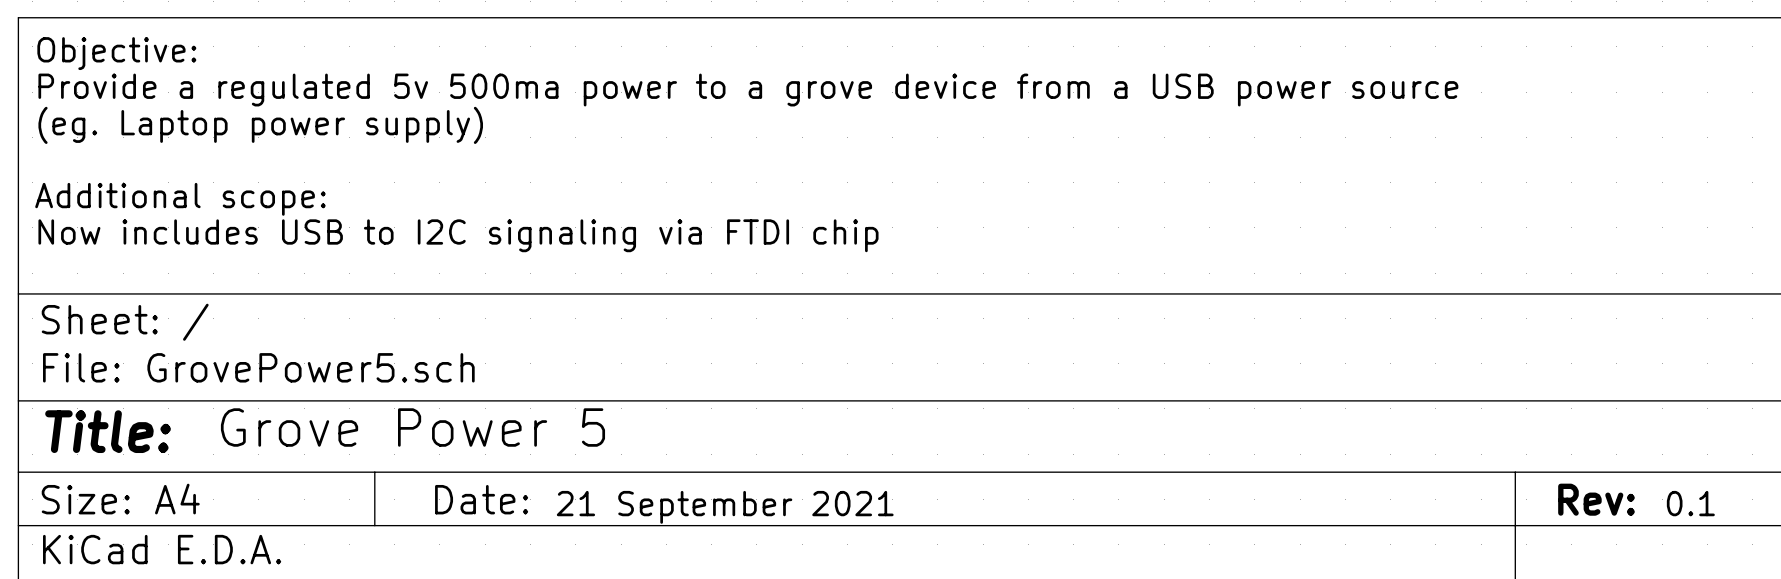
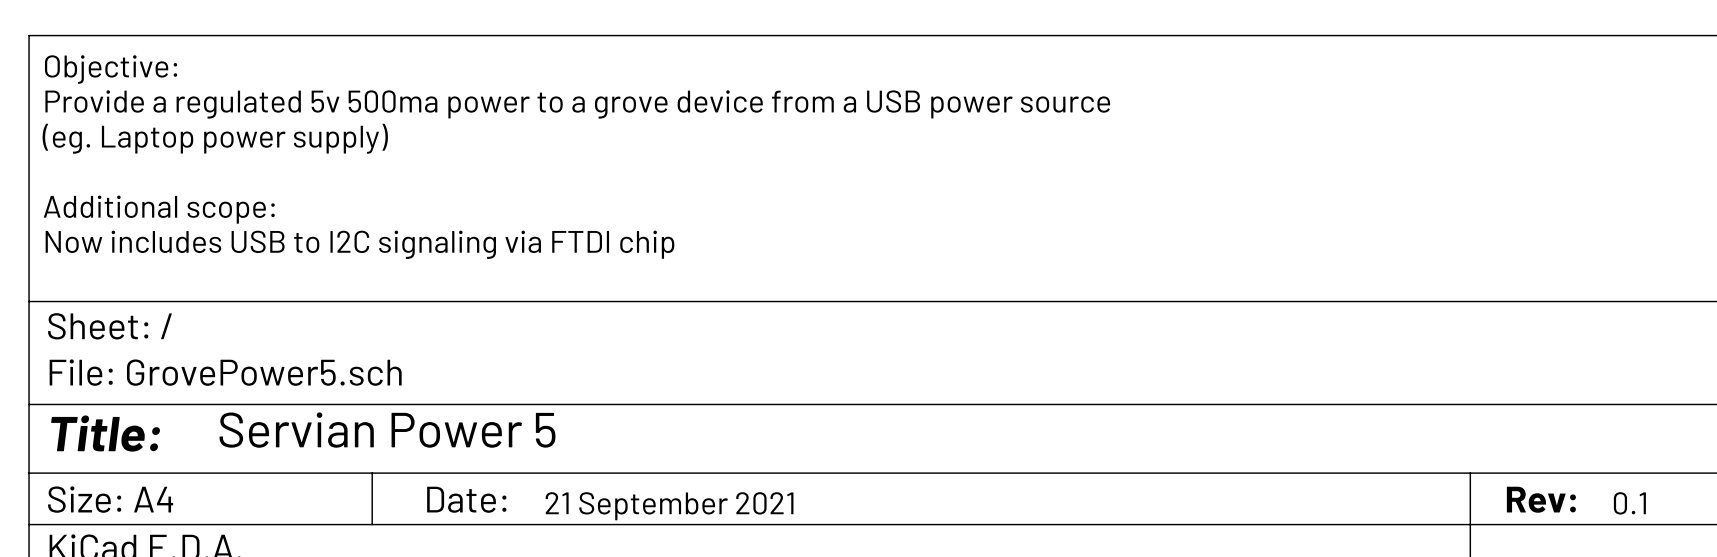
text: Grove Power 5 (412, 427) -> Servian Power 5 (387, 430)

